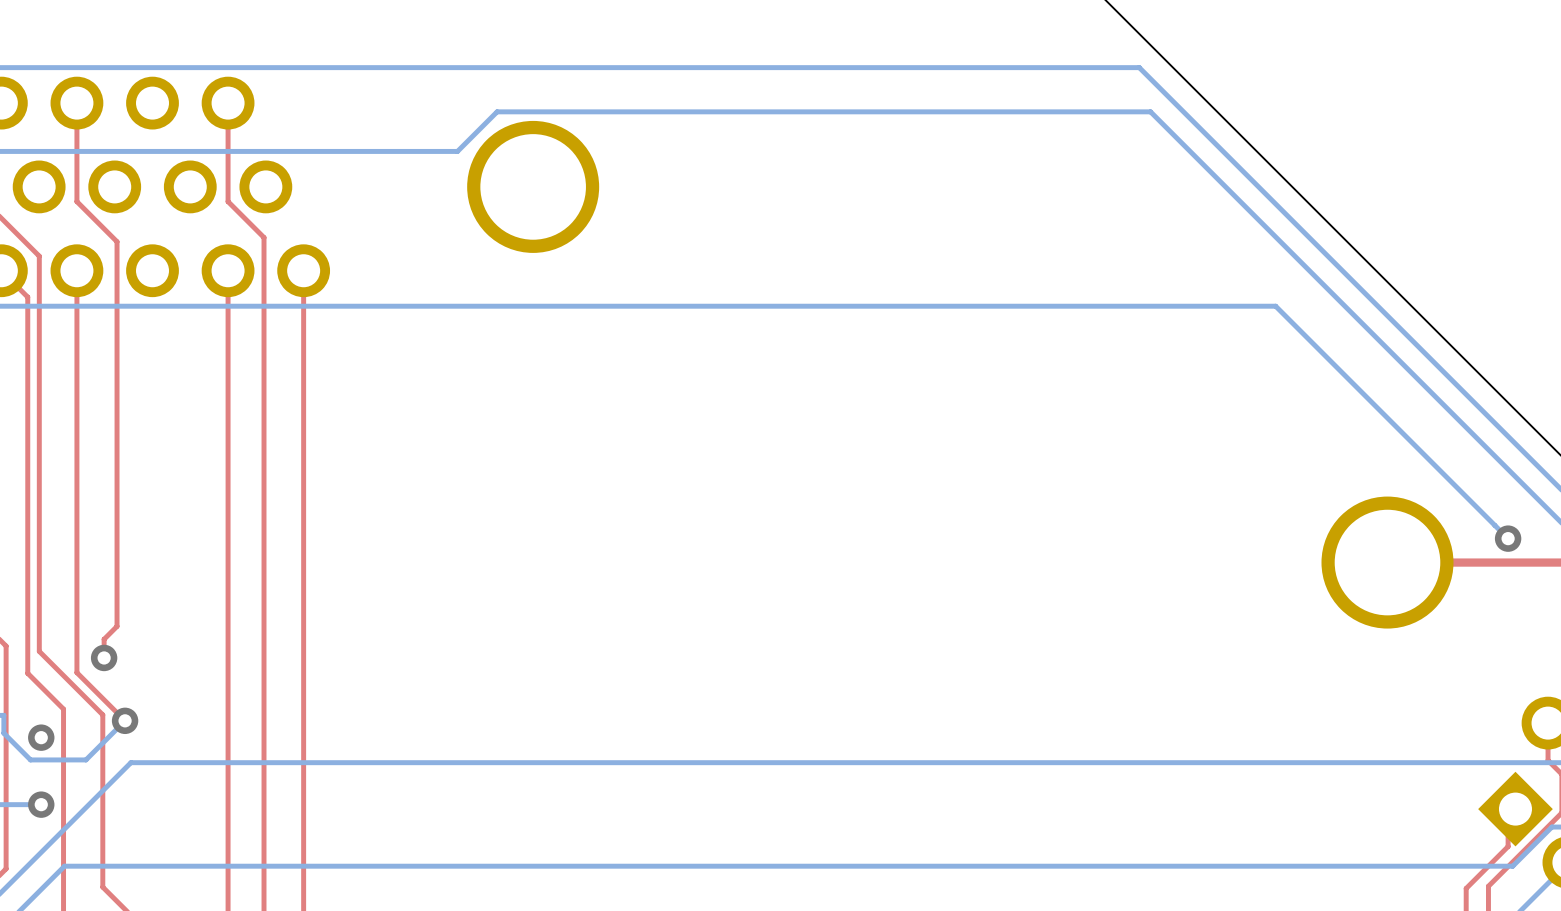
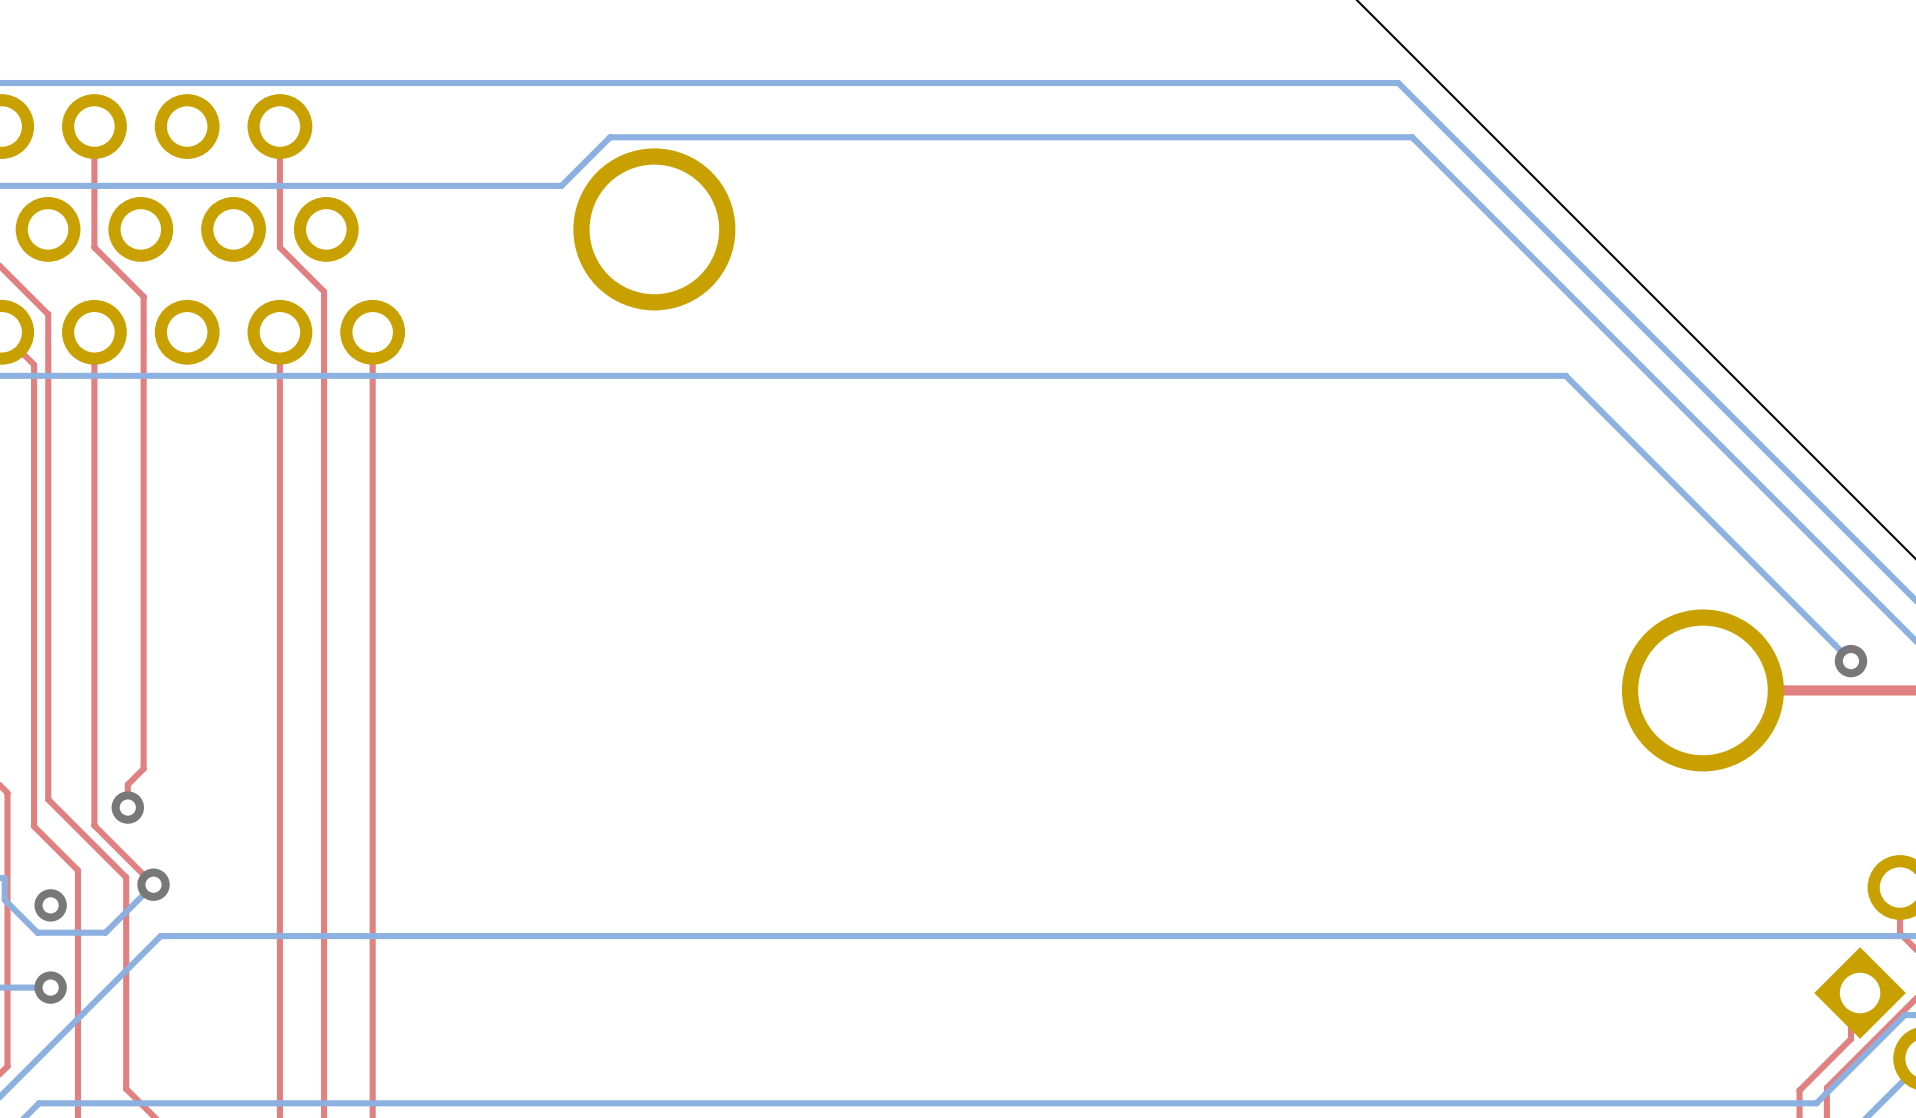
bottom track: (1512, 866) (64, 866) (31, 898) -> (1856, 1063) (1816, 1103) (39, 1103)

